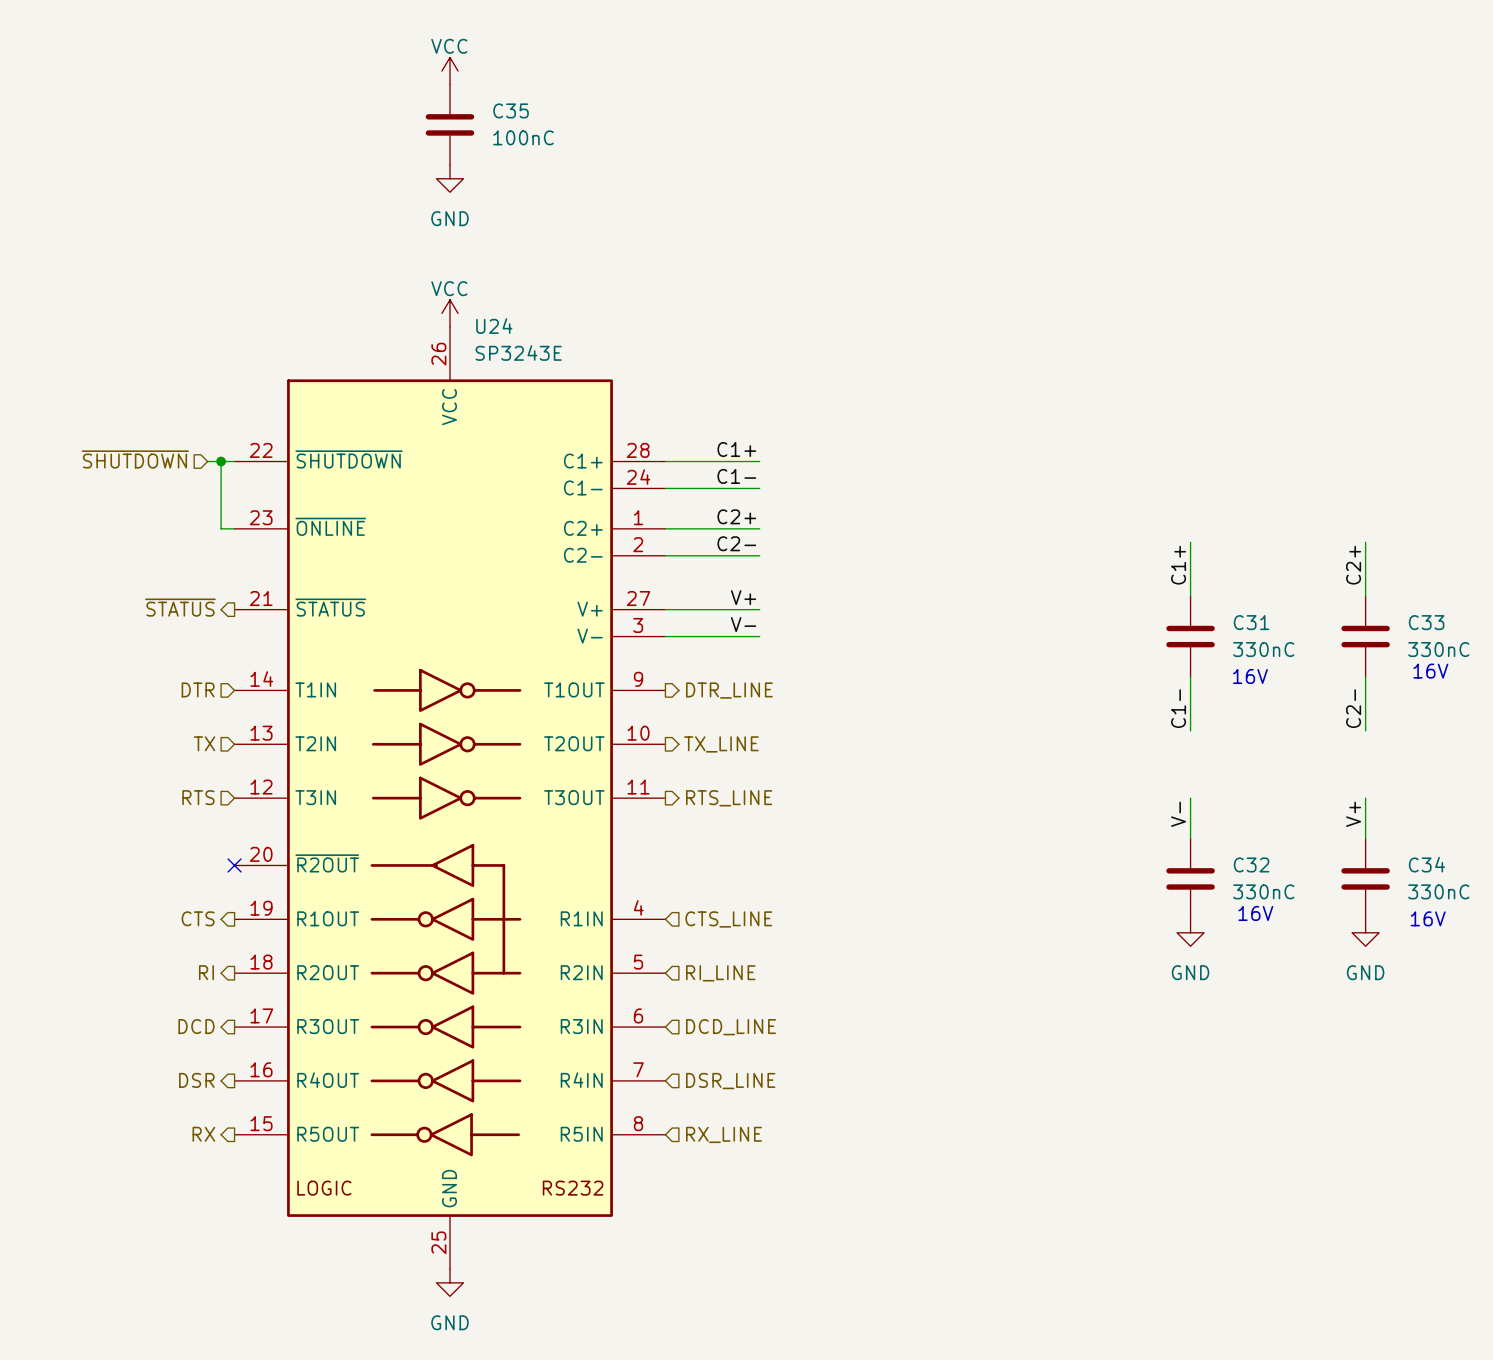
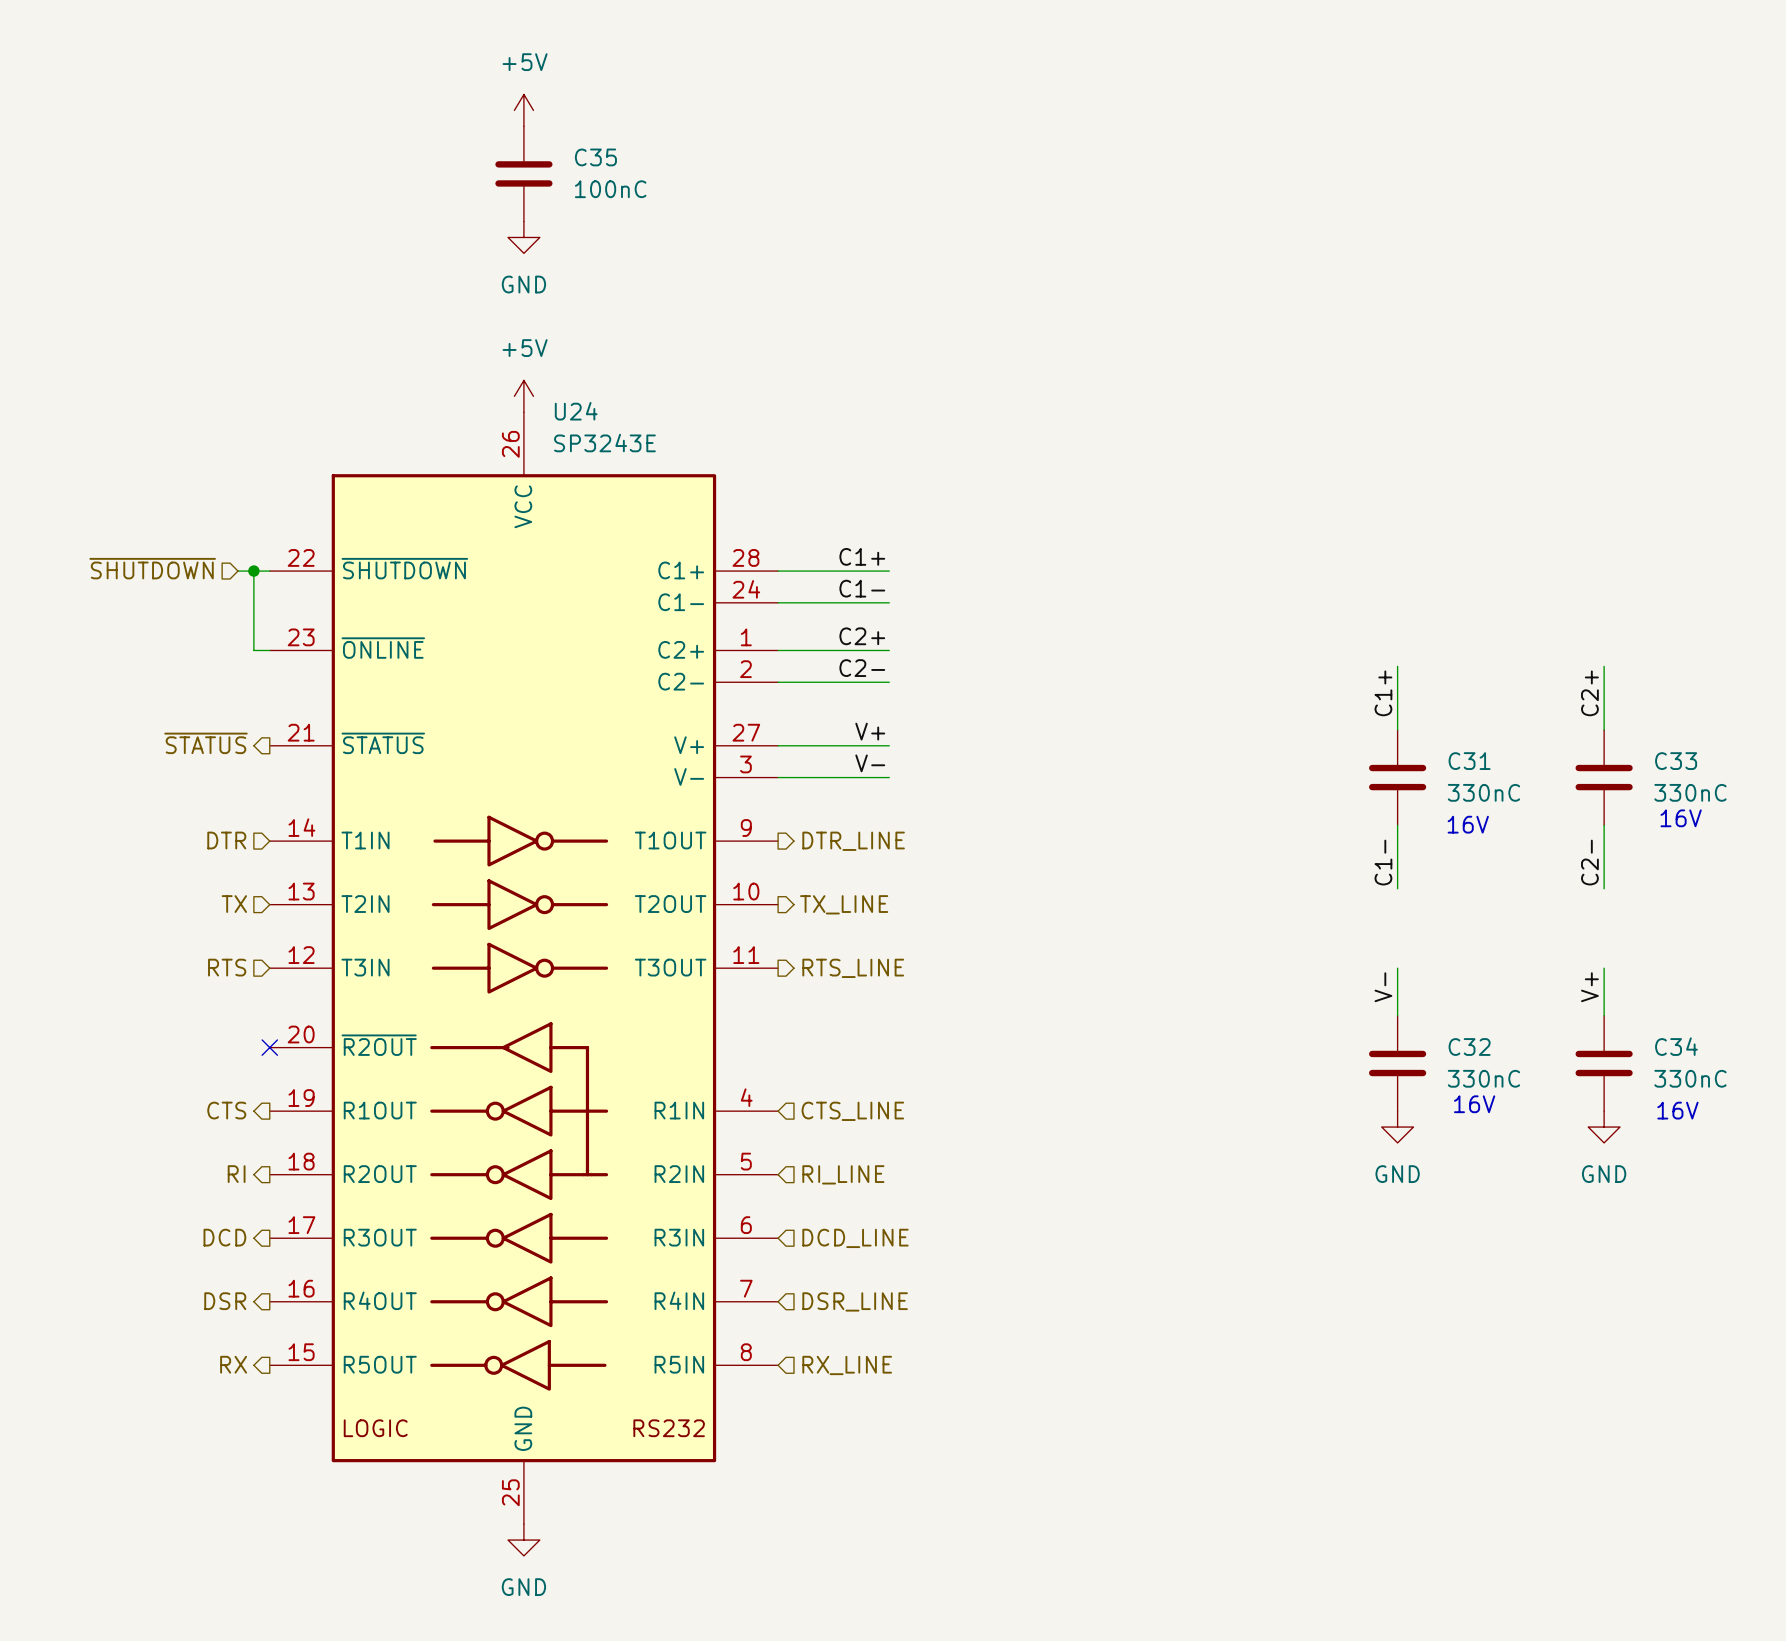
power symbol: VCC (450, 71) -> +5V (523, 110)
power symbol: VCC (450, 313) -> +5V (523, 396)

